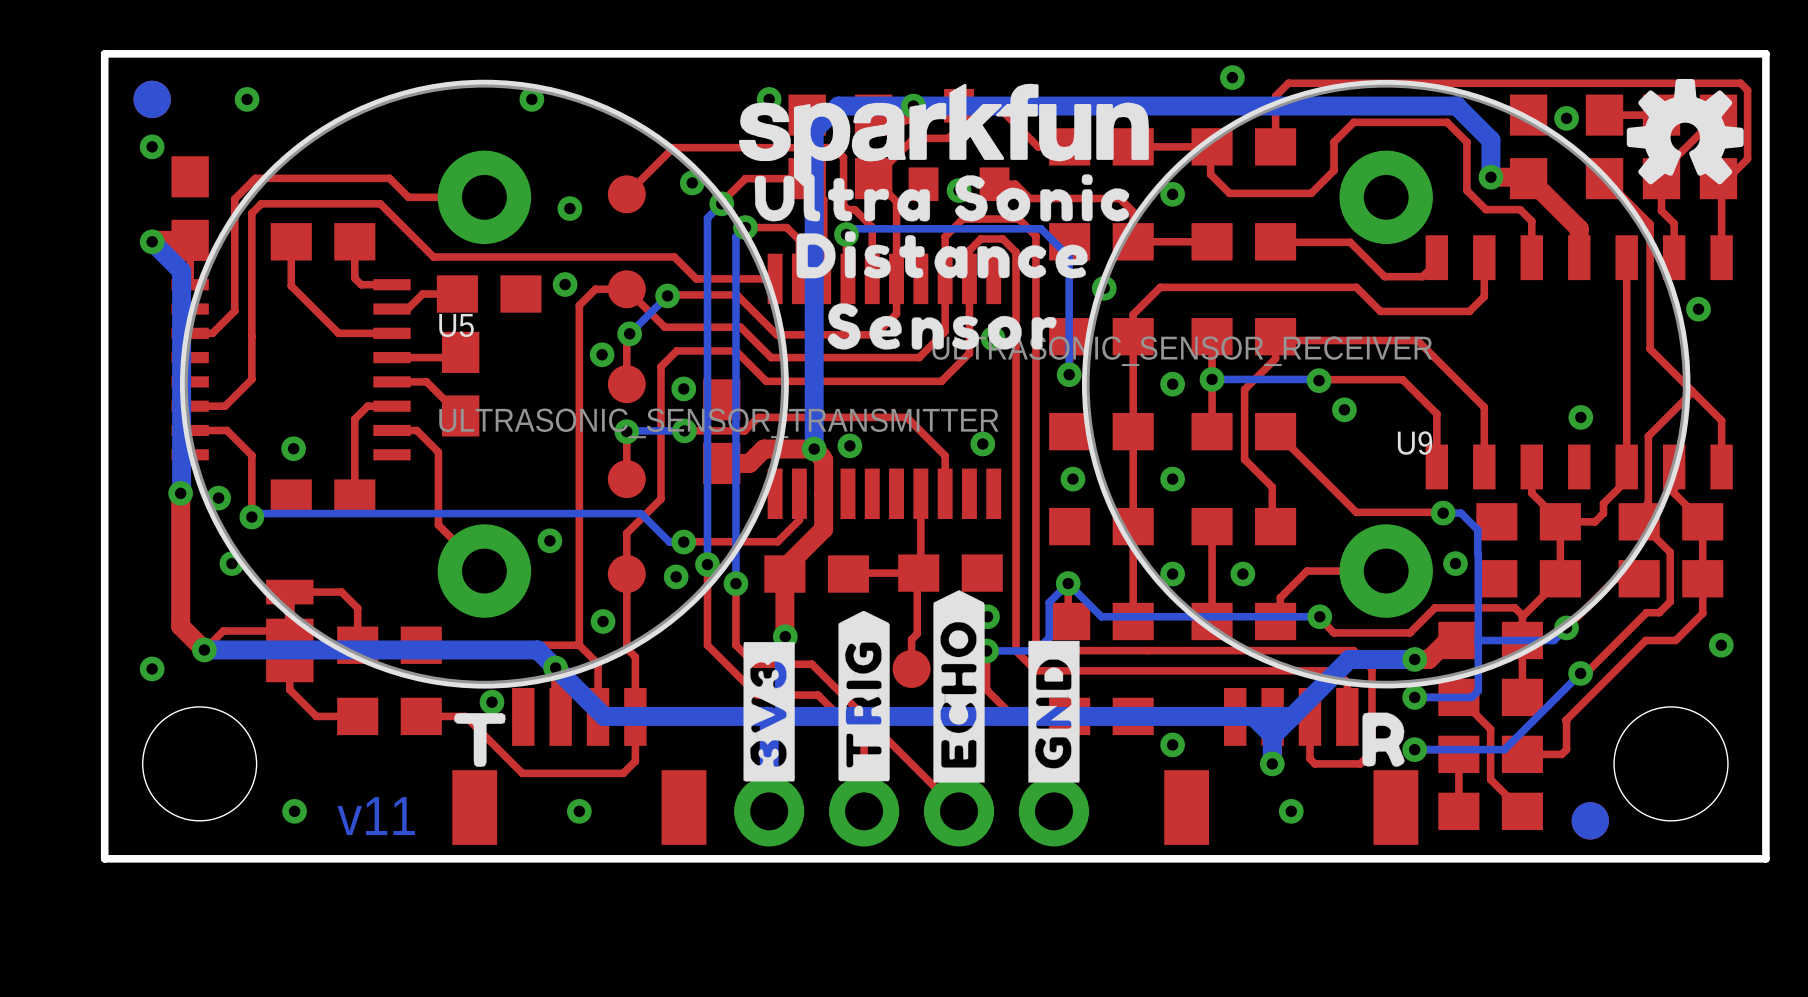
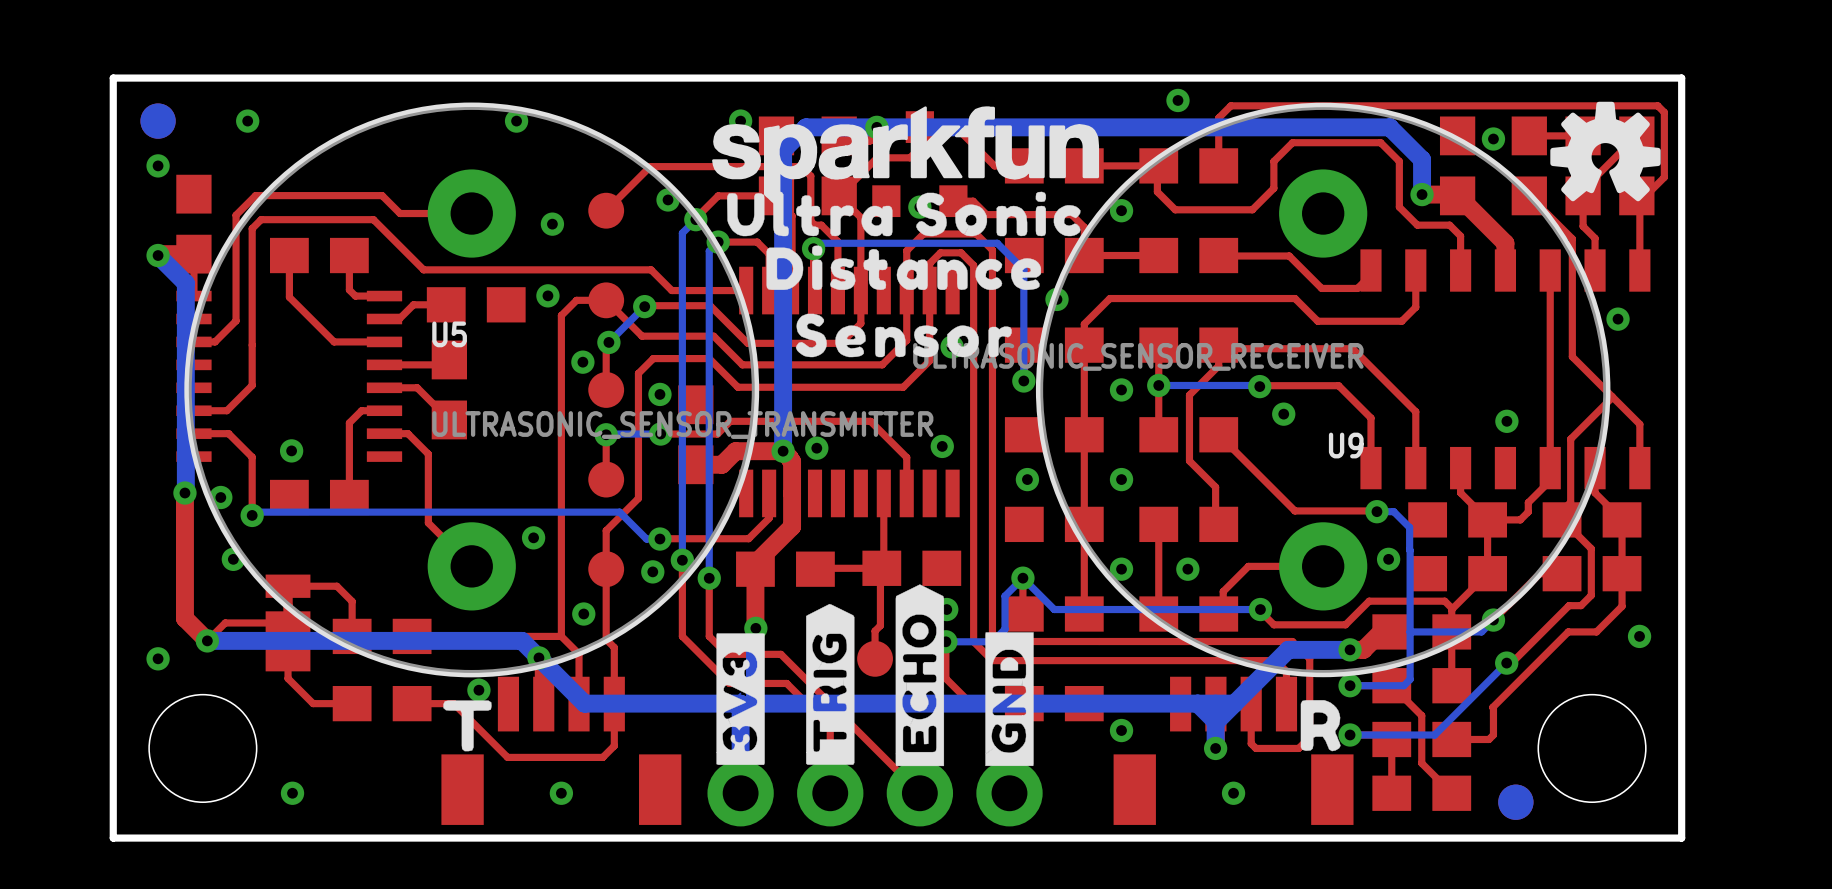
text: v11 (376, 816) -> none

